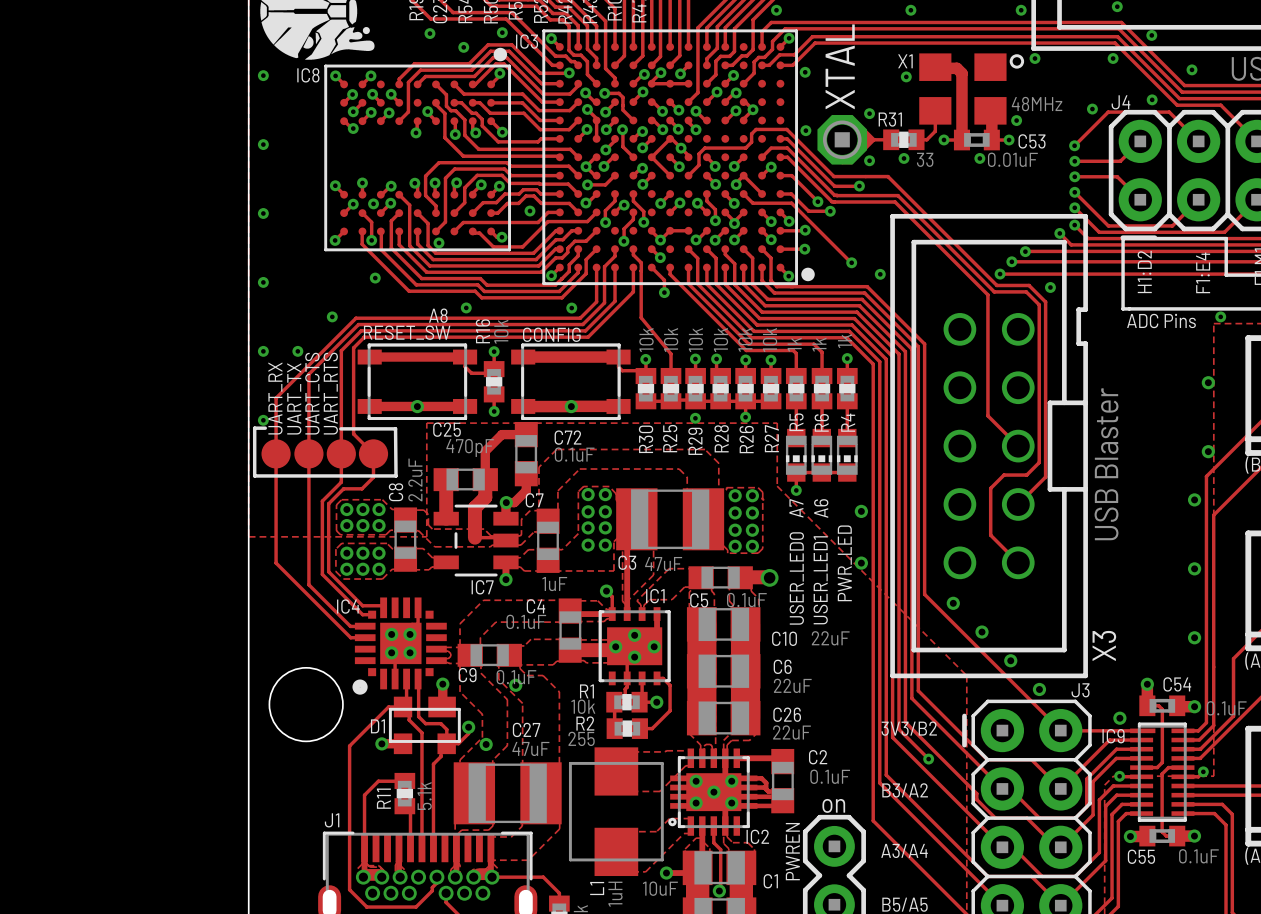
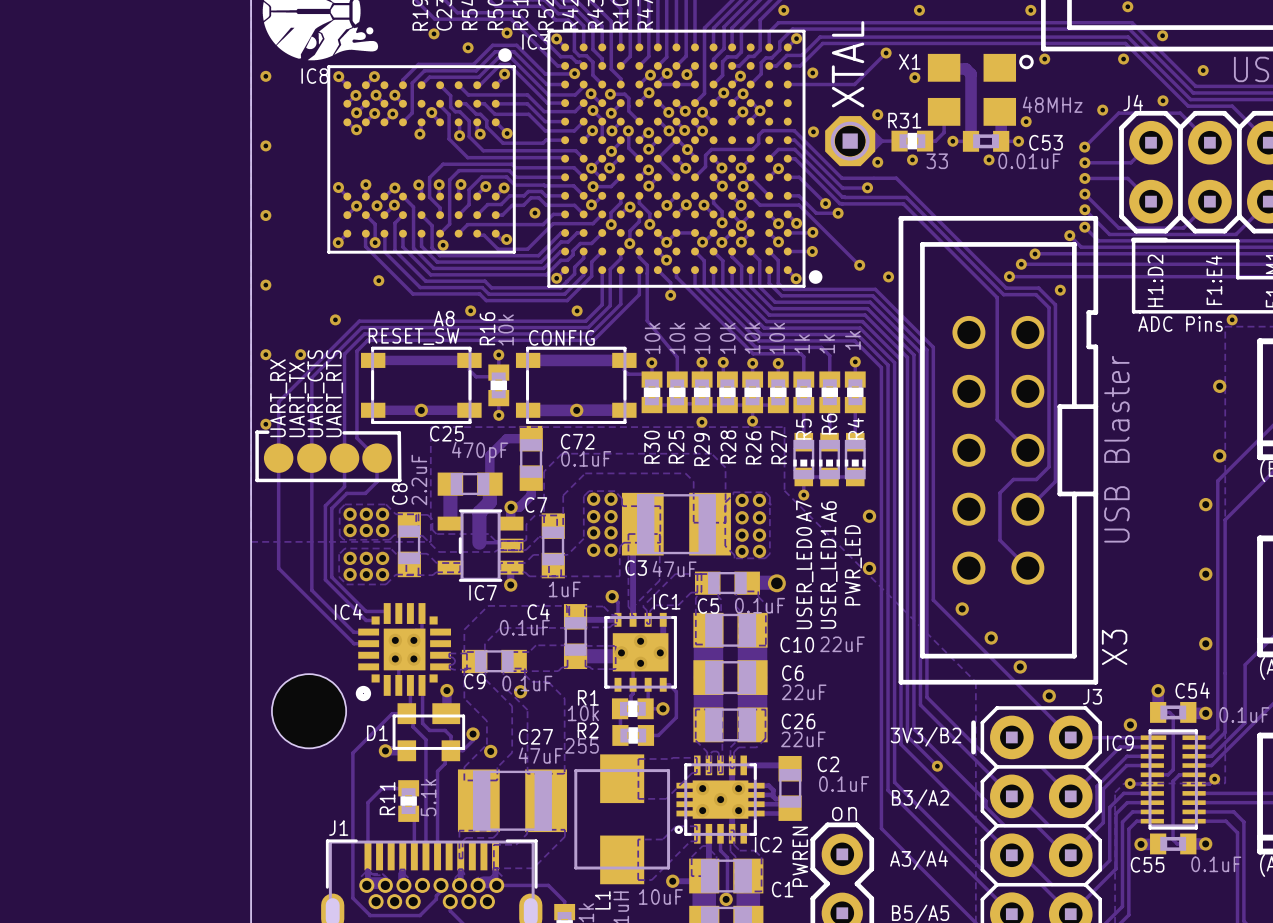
track: none -> (886, 53) (854, 84) (787, 84)
via: none -> (886, 53)
IC7 footprint: [433, 504, 519, 577] -> [437, 509, 524, 582]

